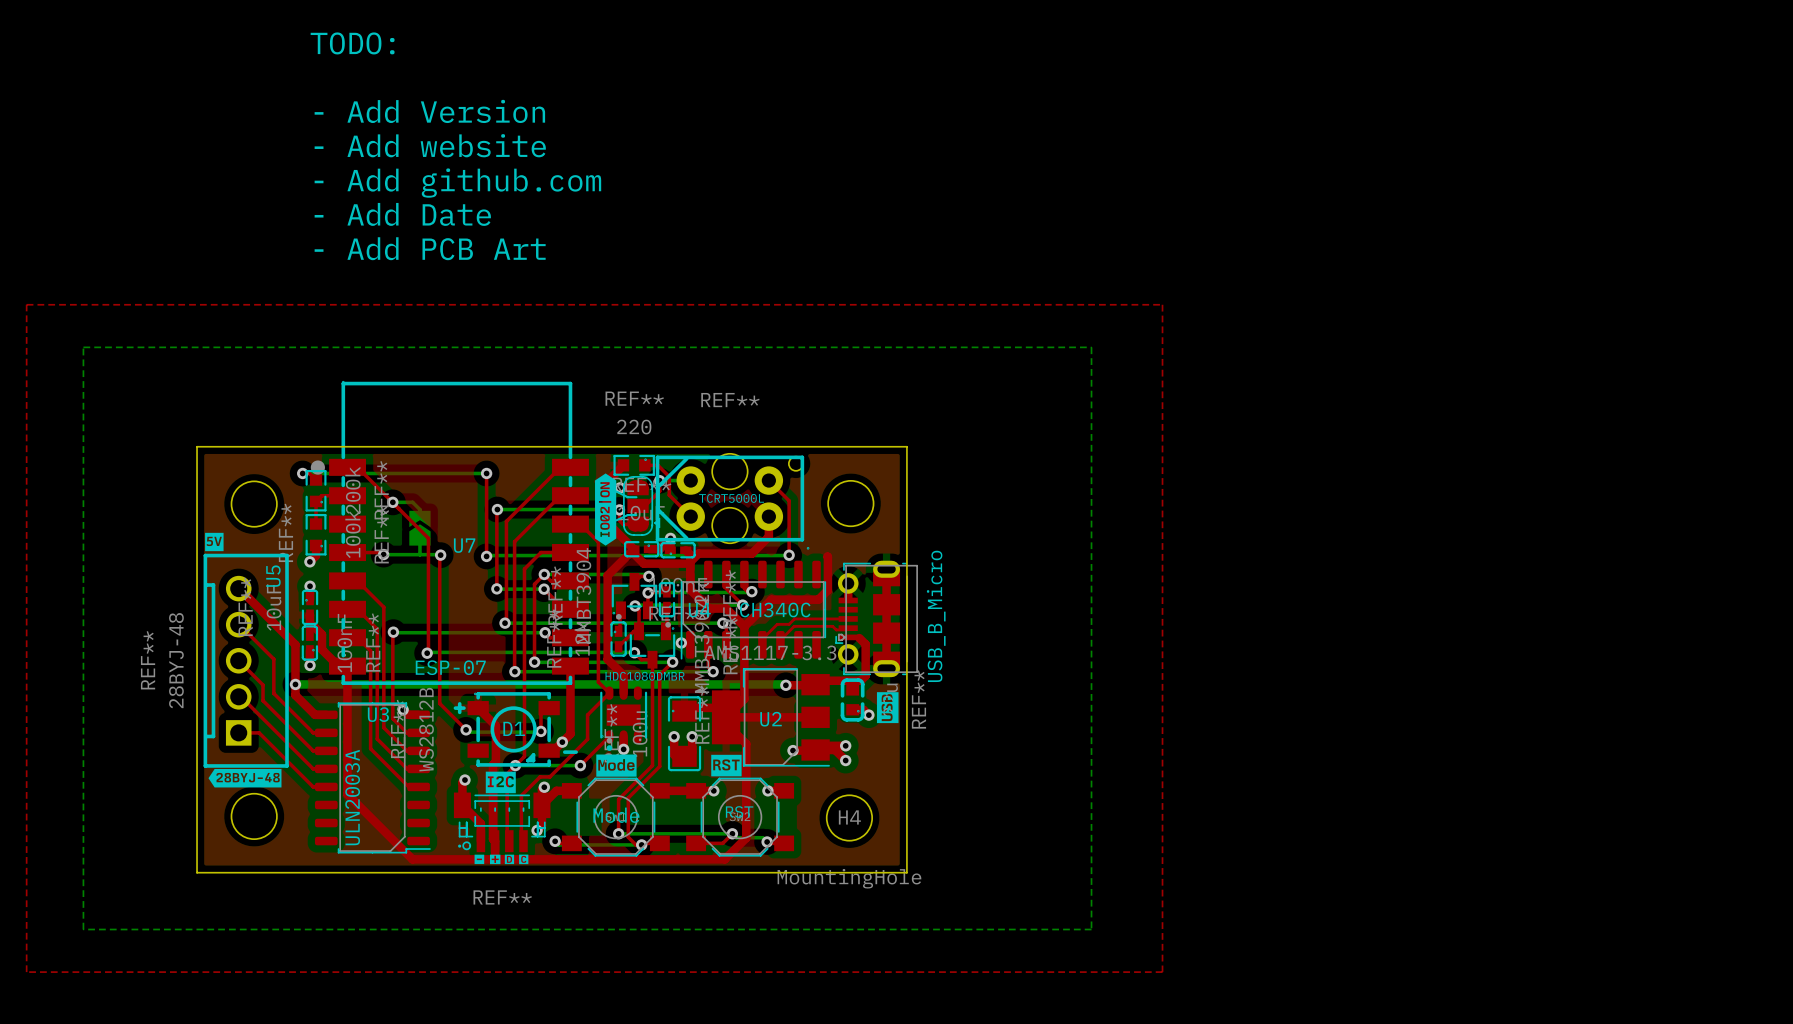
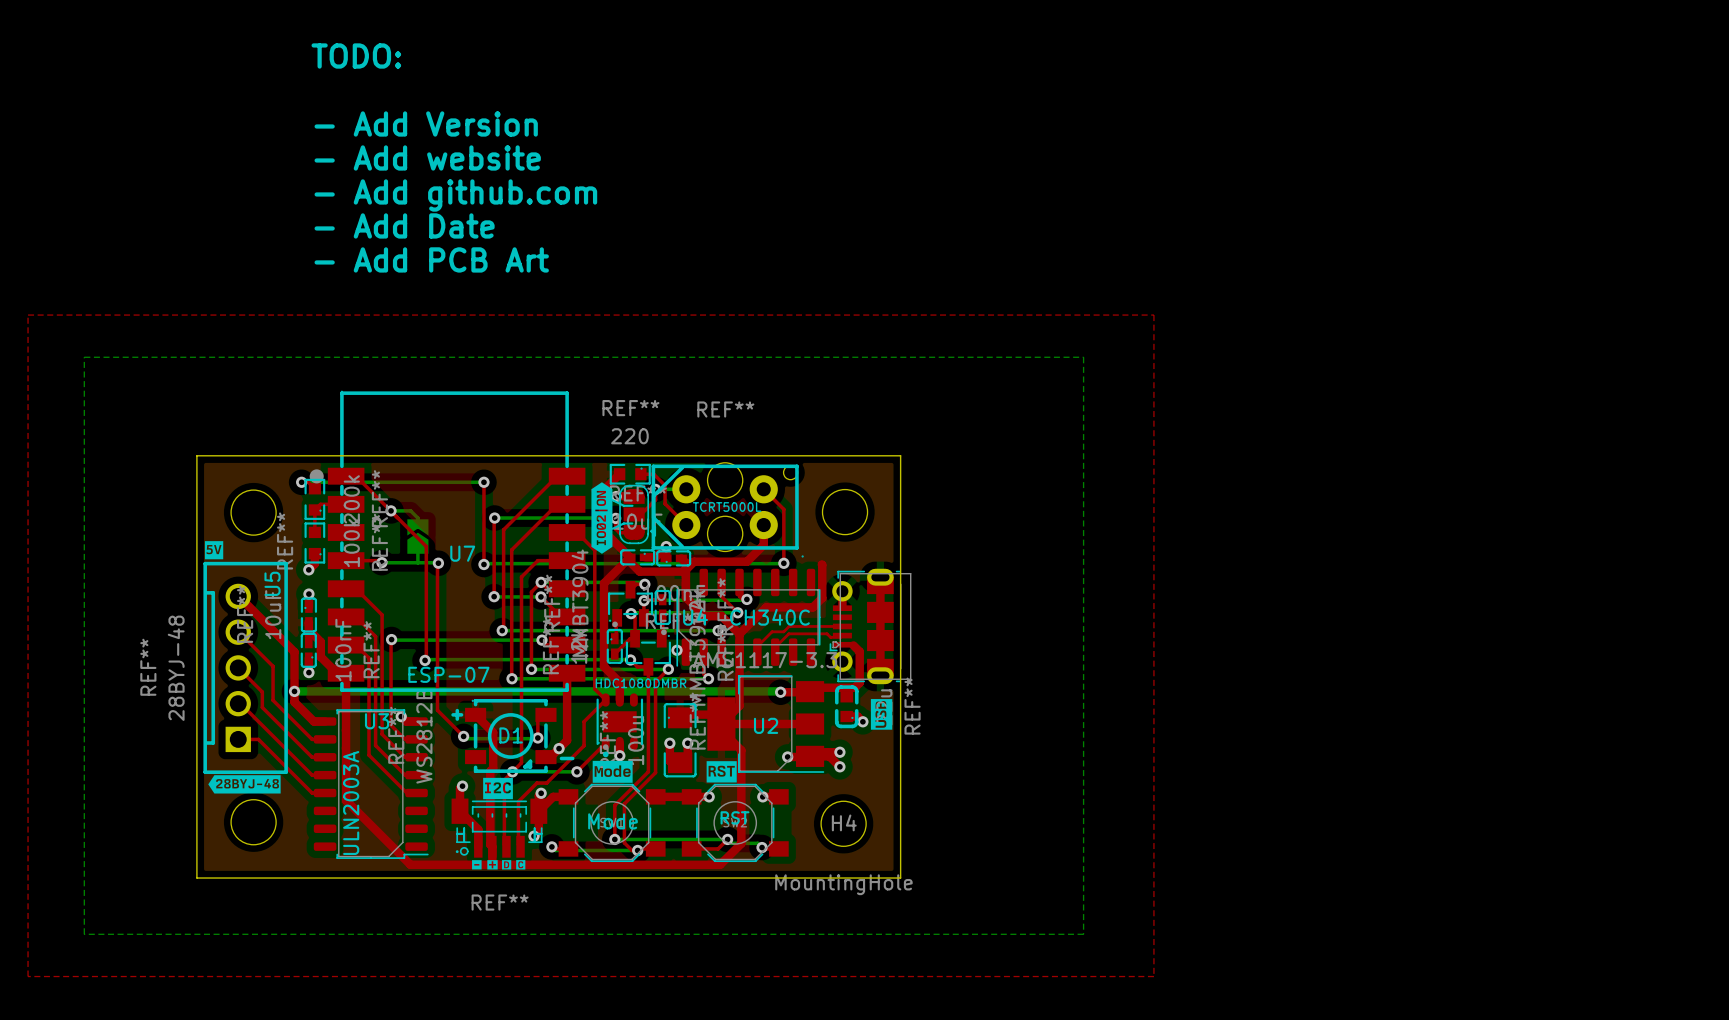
part value: USB_B_Micro (936, 616) -> none

